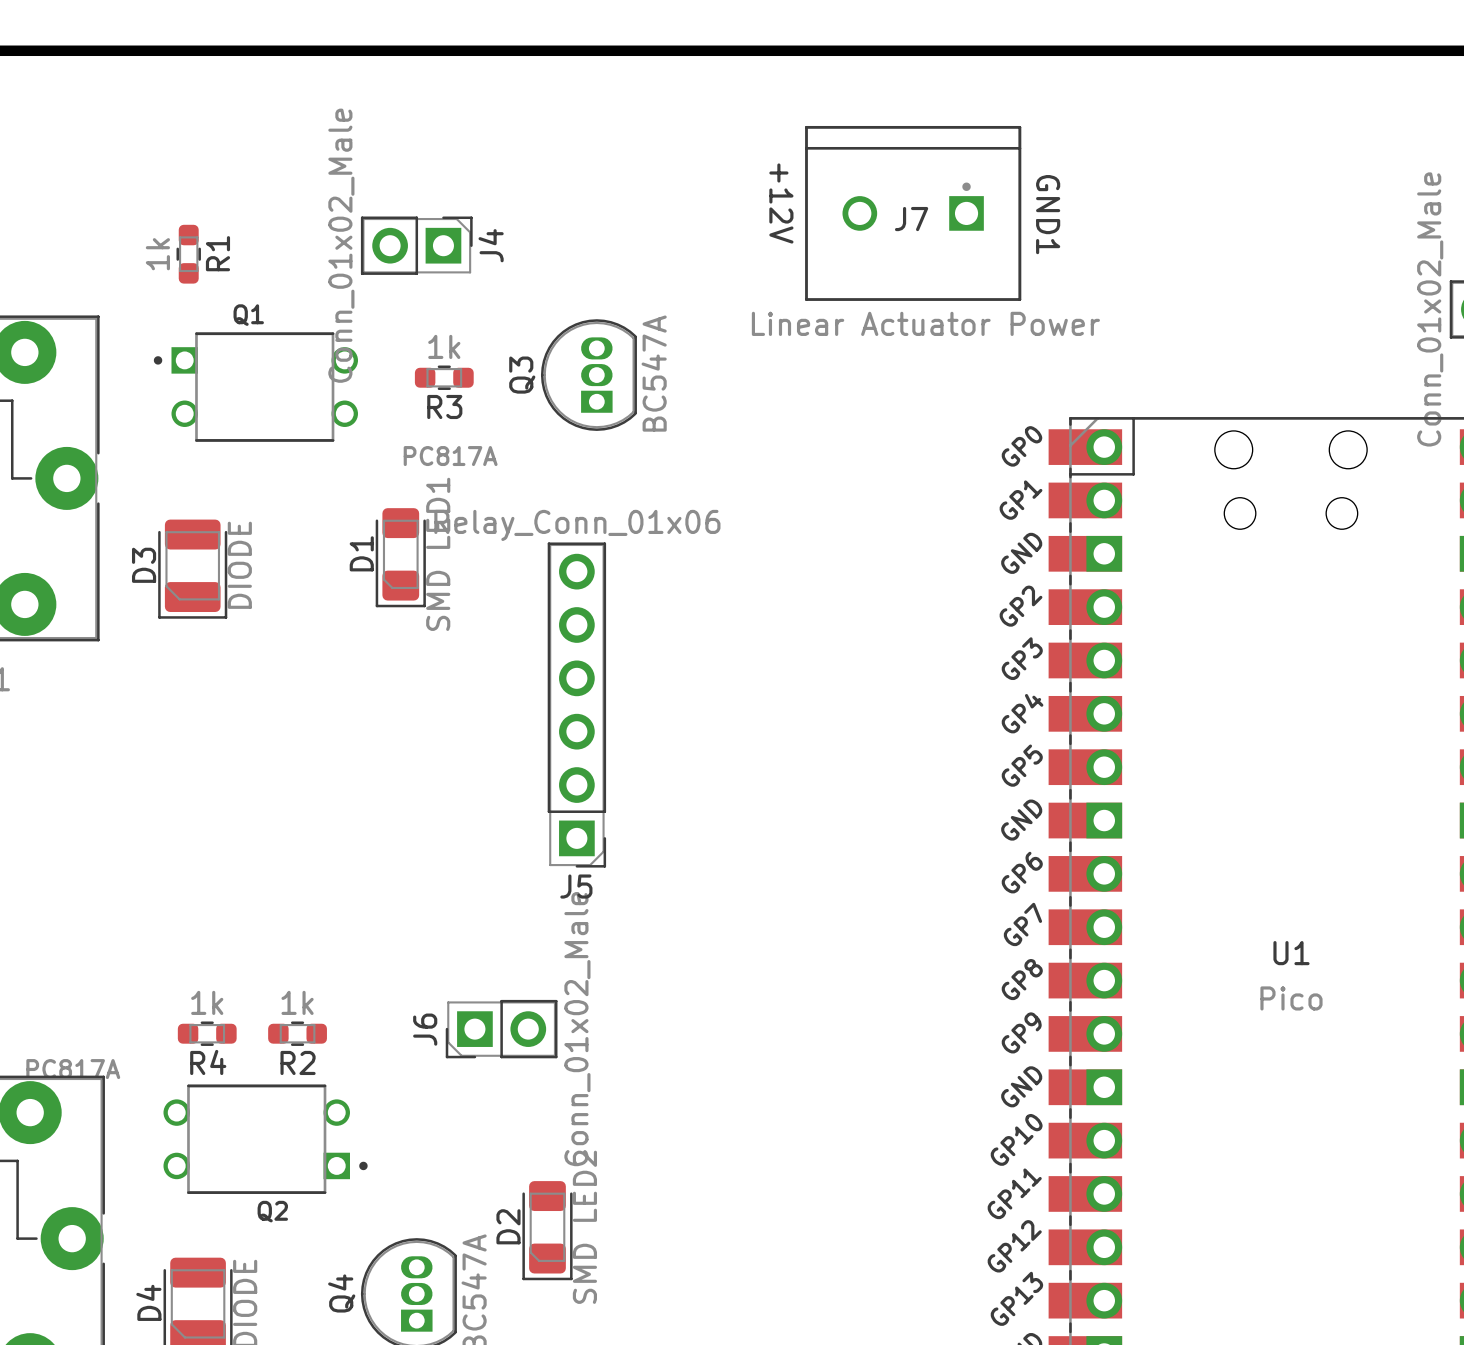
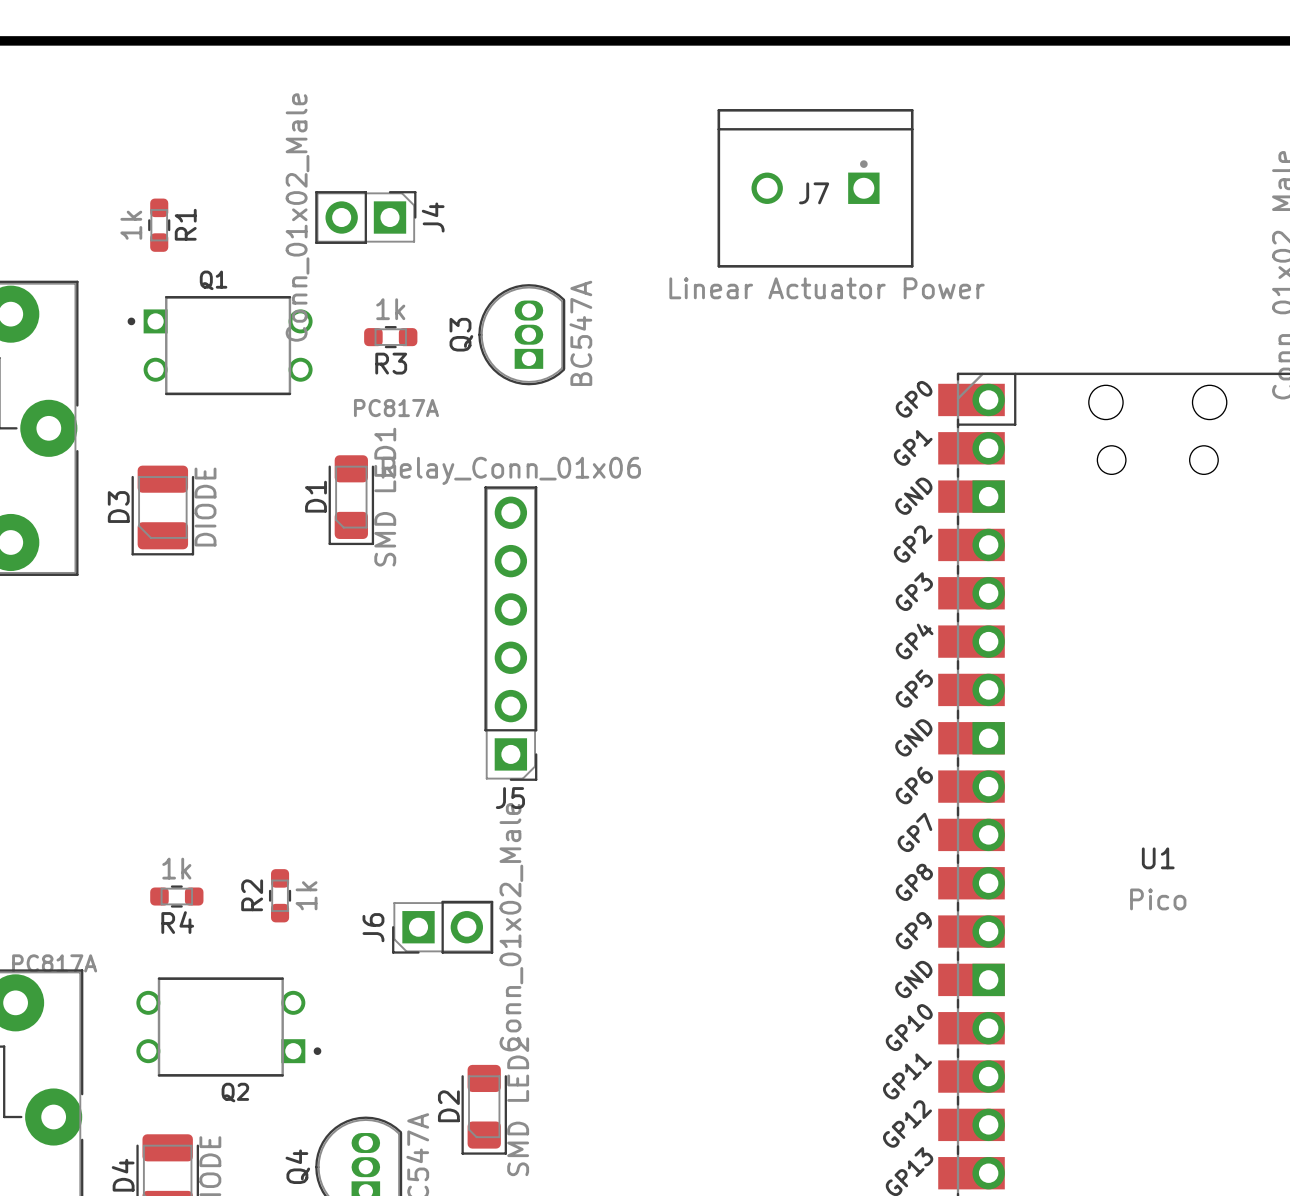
text: +12V (781, 203) -> none
text: GND1 (1048, 214) -> none
R4 position: (207, 1033) -> (176, 896)
R2 rotation: 0° (297, 1033) -> 90° clockwise (280, 895)
R2 position: (297, 1033) -> (280, 895)

